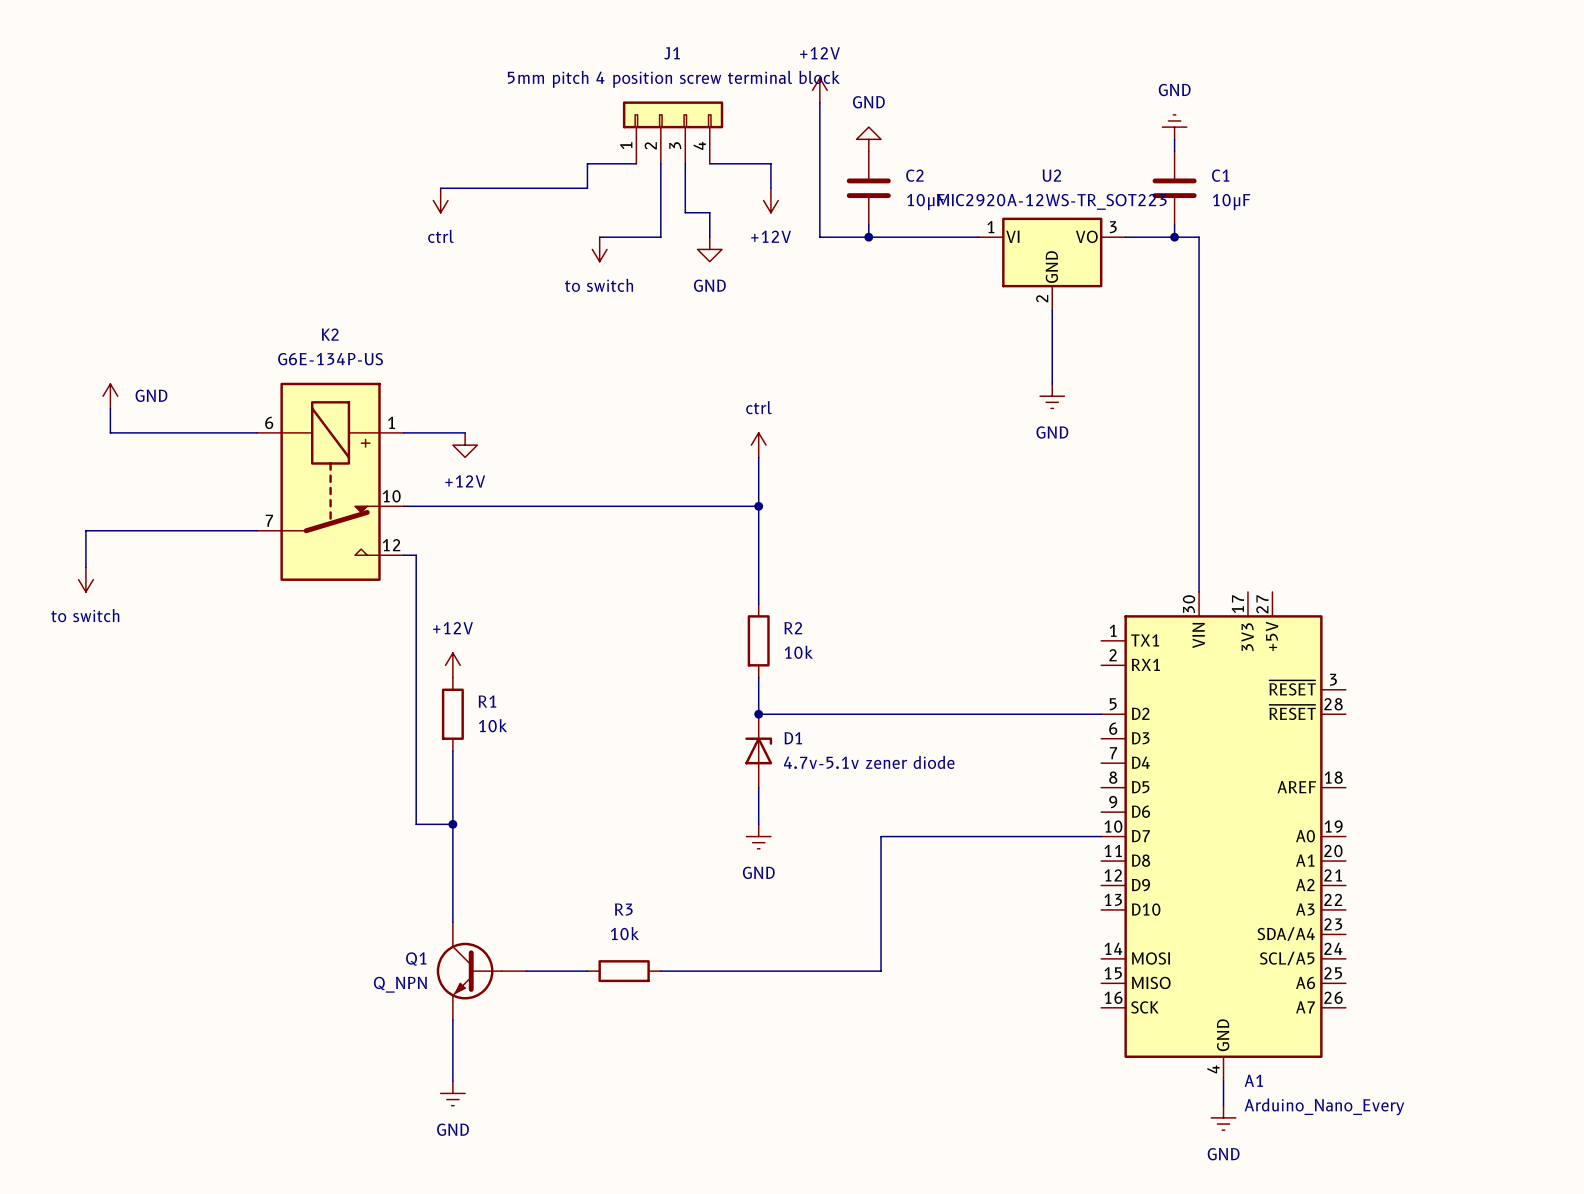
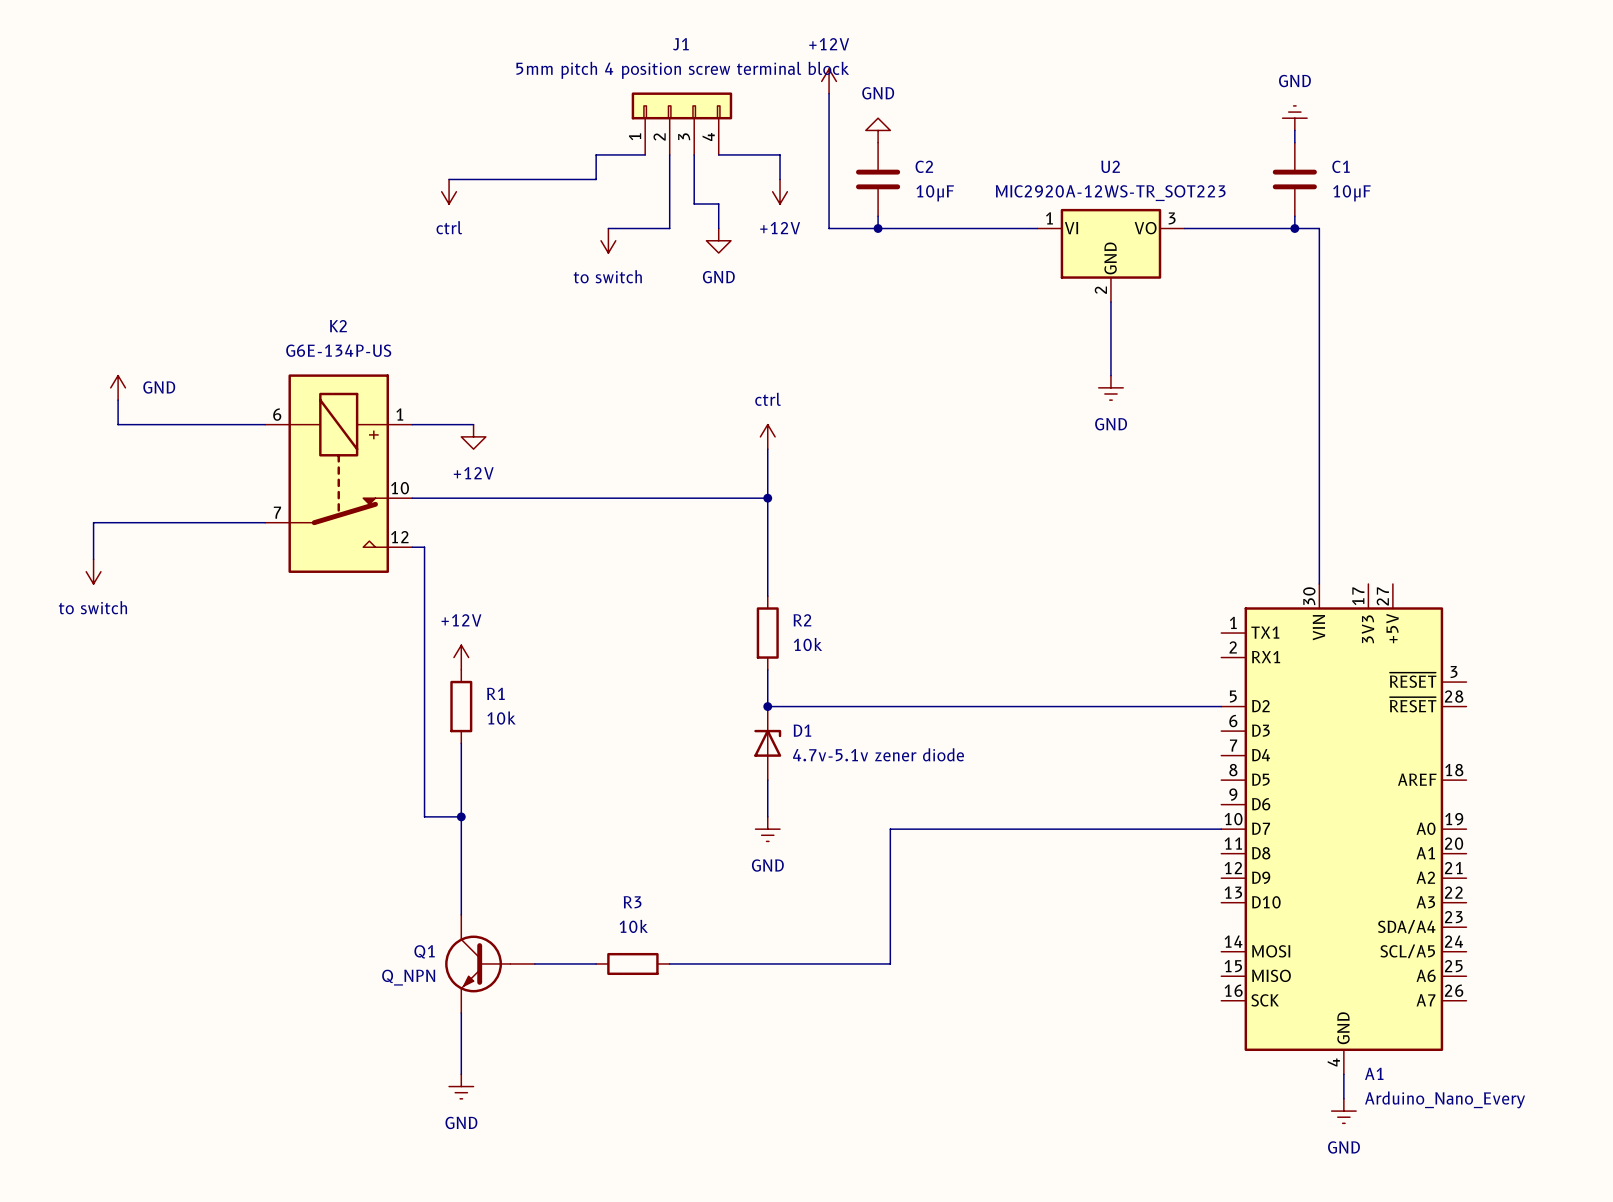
power symbol position: GND (1174, 127) -> GND (1294, 118)
wire: (1174, 139) (1174, 151) -> (1294, 130) (1294, 142)
C1 position: (1174, 188) -> (1294, 179)
wire: none -> (1294, 216) (1294, 228)
junction: (1174, 237) -> none
wire: (1199, 237) (1199, 591) -> (1209, 228) (1319, 228) (1319, 583)
junction: none -> (1294, 228)
U2 position: (1052, 264) -> (1110, 255)
wire: (1052, 310) (1052, 383) -> (1110, 302) (1110, 375)
power symbol position: GND (1052, 396) -> GND (1110, 387)
A1 position: (1223, 836) -> (1343, 829)
wire: (1223, 1081) (1223, 1105) -> (1343, 1074) (1343, 1098)
power symbol position: GND (1223, 1117) -> GND (1343, 1111)

